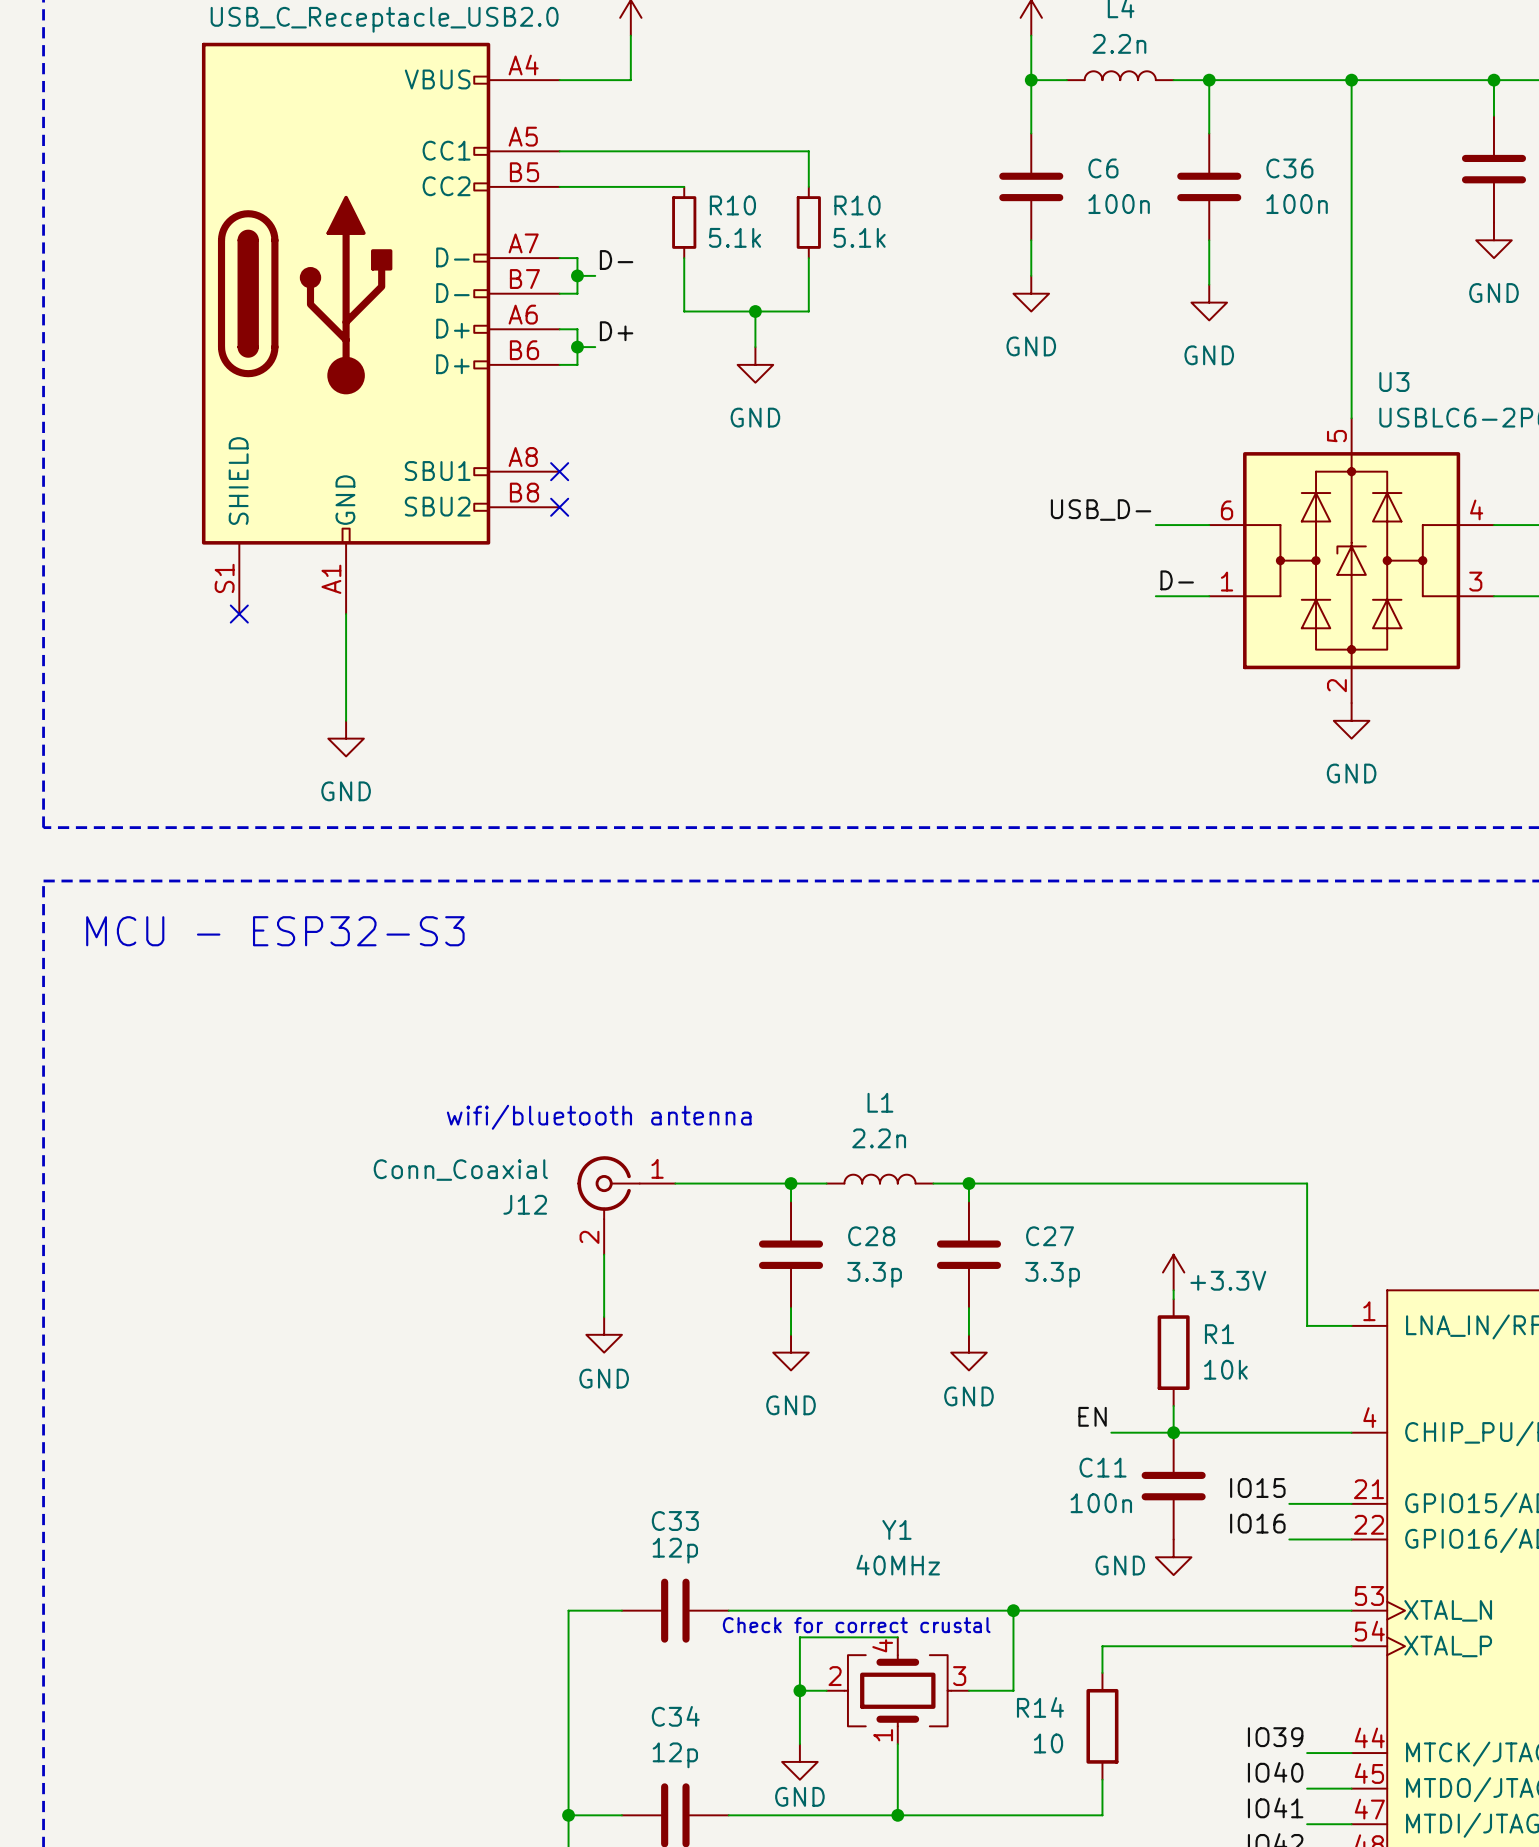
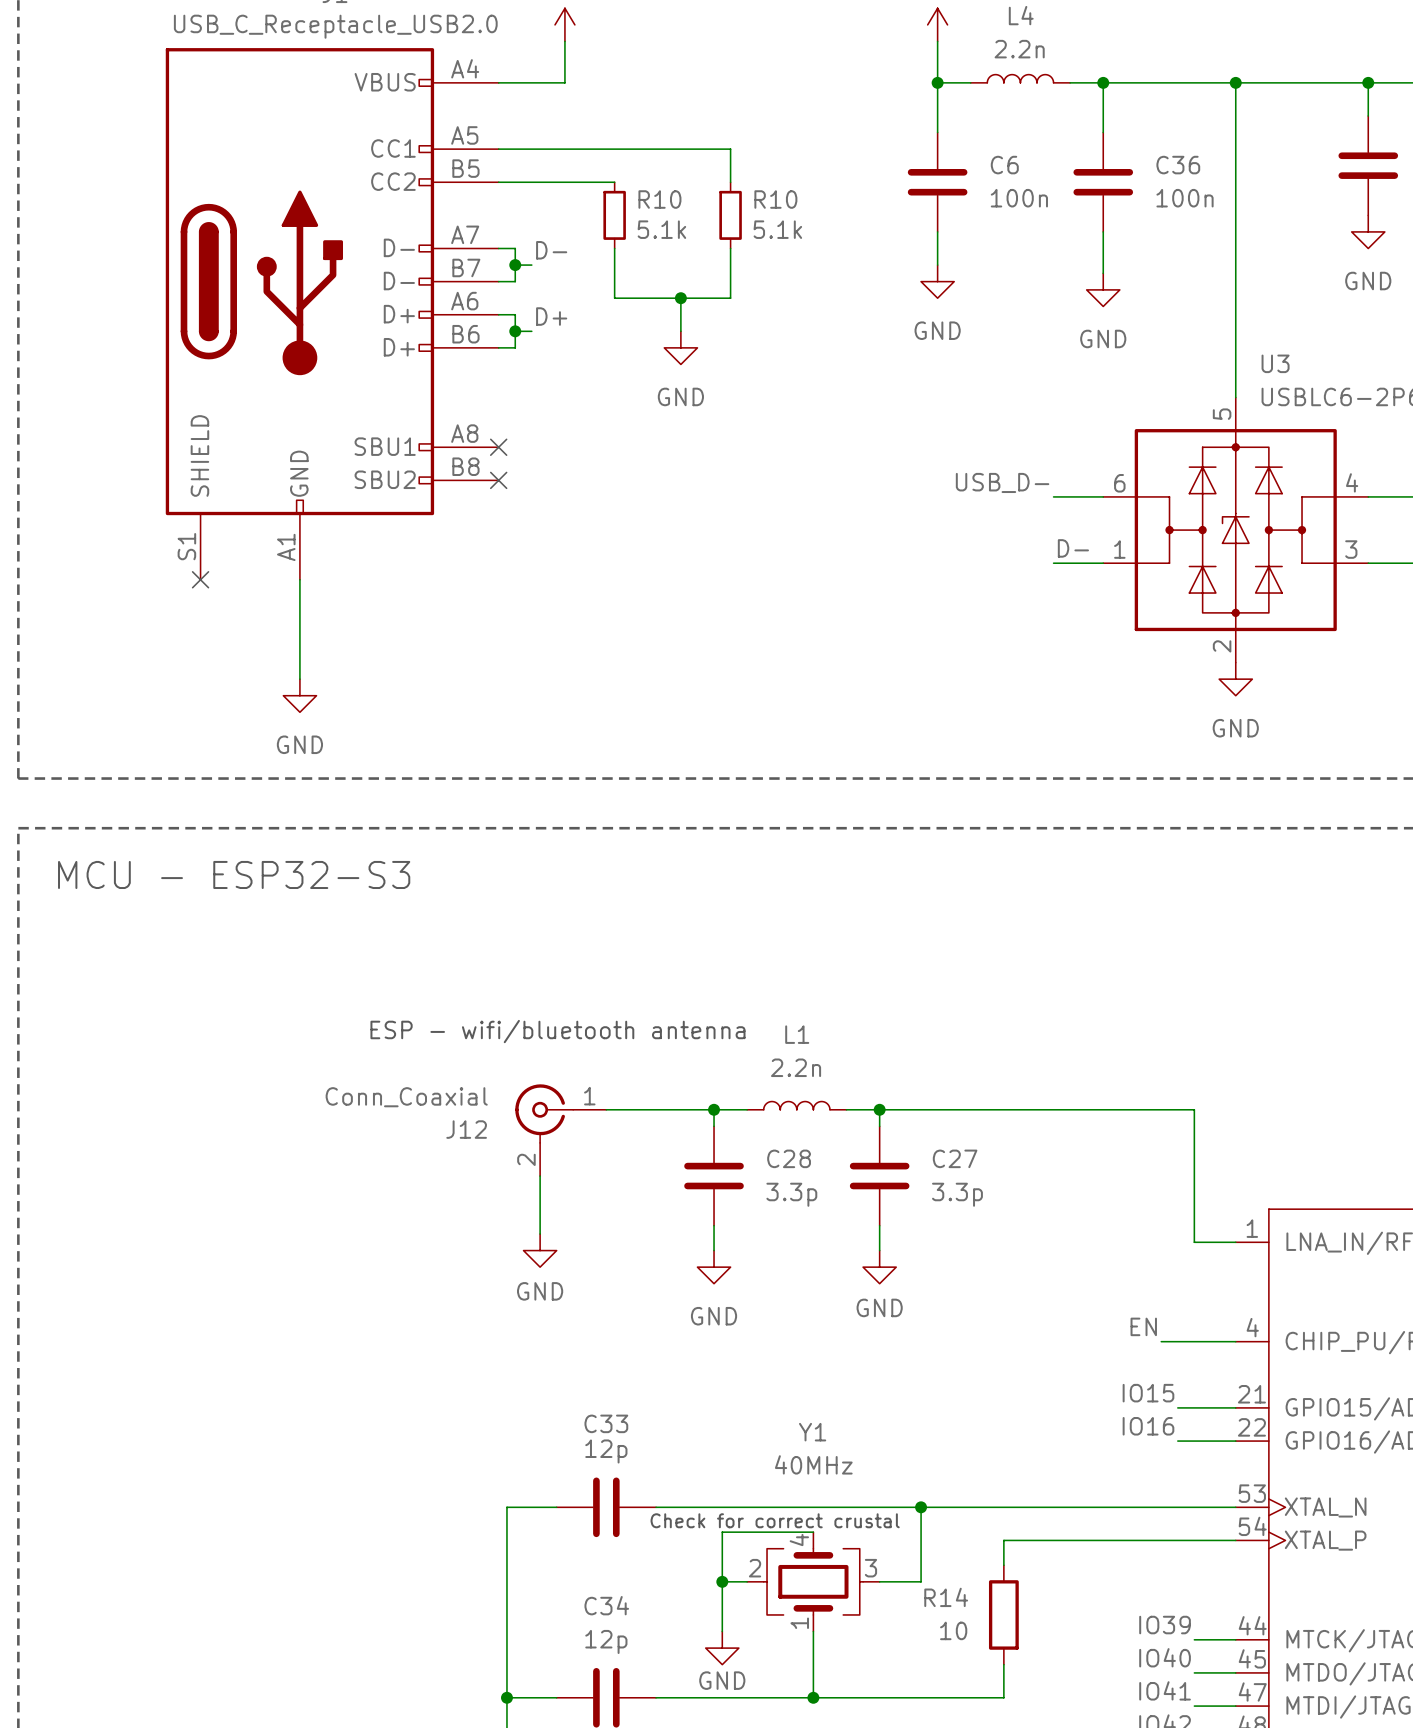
text: wifi/bluetooth antenna (599, 1117) -> ESP - wifi/bluetooth antenna (557, 1031)
power symbol: +3.3V (1173, 1272) -> none
wire: (1173, 1290) (1173, 1299) -> none
R1: 10k (1173, 1352) -> none
wire: (1173, 1406) (1173, 1432) -> none
label position: EN (1092, 1416) -> EN (1143, 1326)
wire: (1111, 1432) (1271, 1432) -> none
junction: (1173, 1432) -> none
C11: 100n (1173, 1486) -> none
power symbol: GND (1173, 1557) -> none

